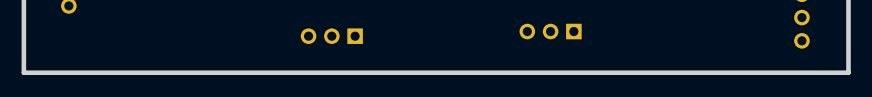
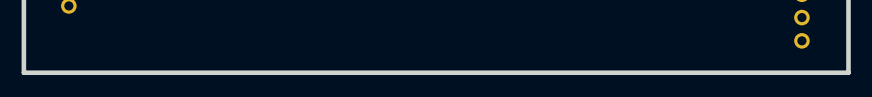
part: (550, 31) -> none
part: (331, 36) -> none

